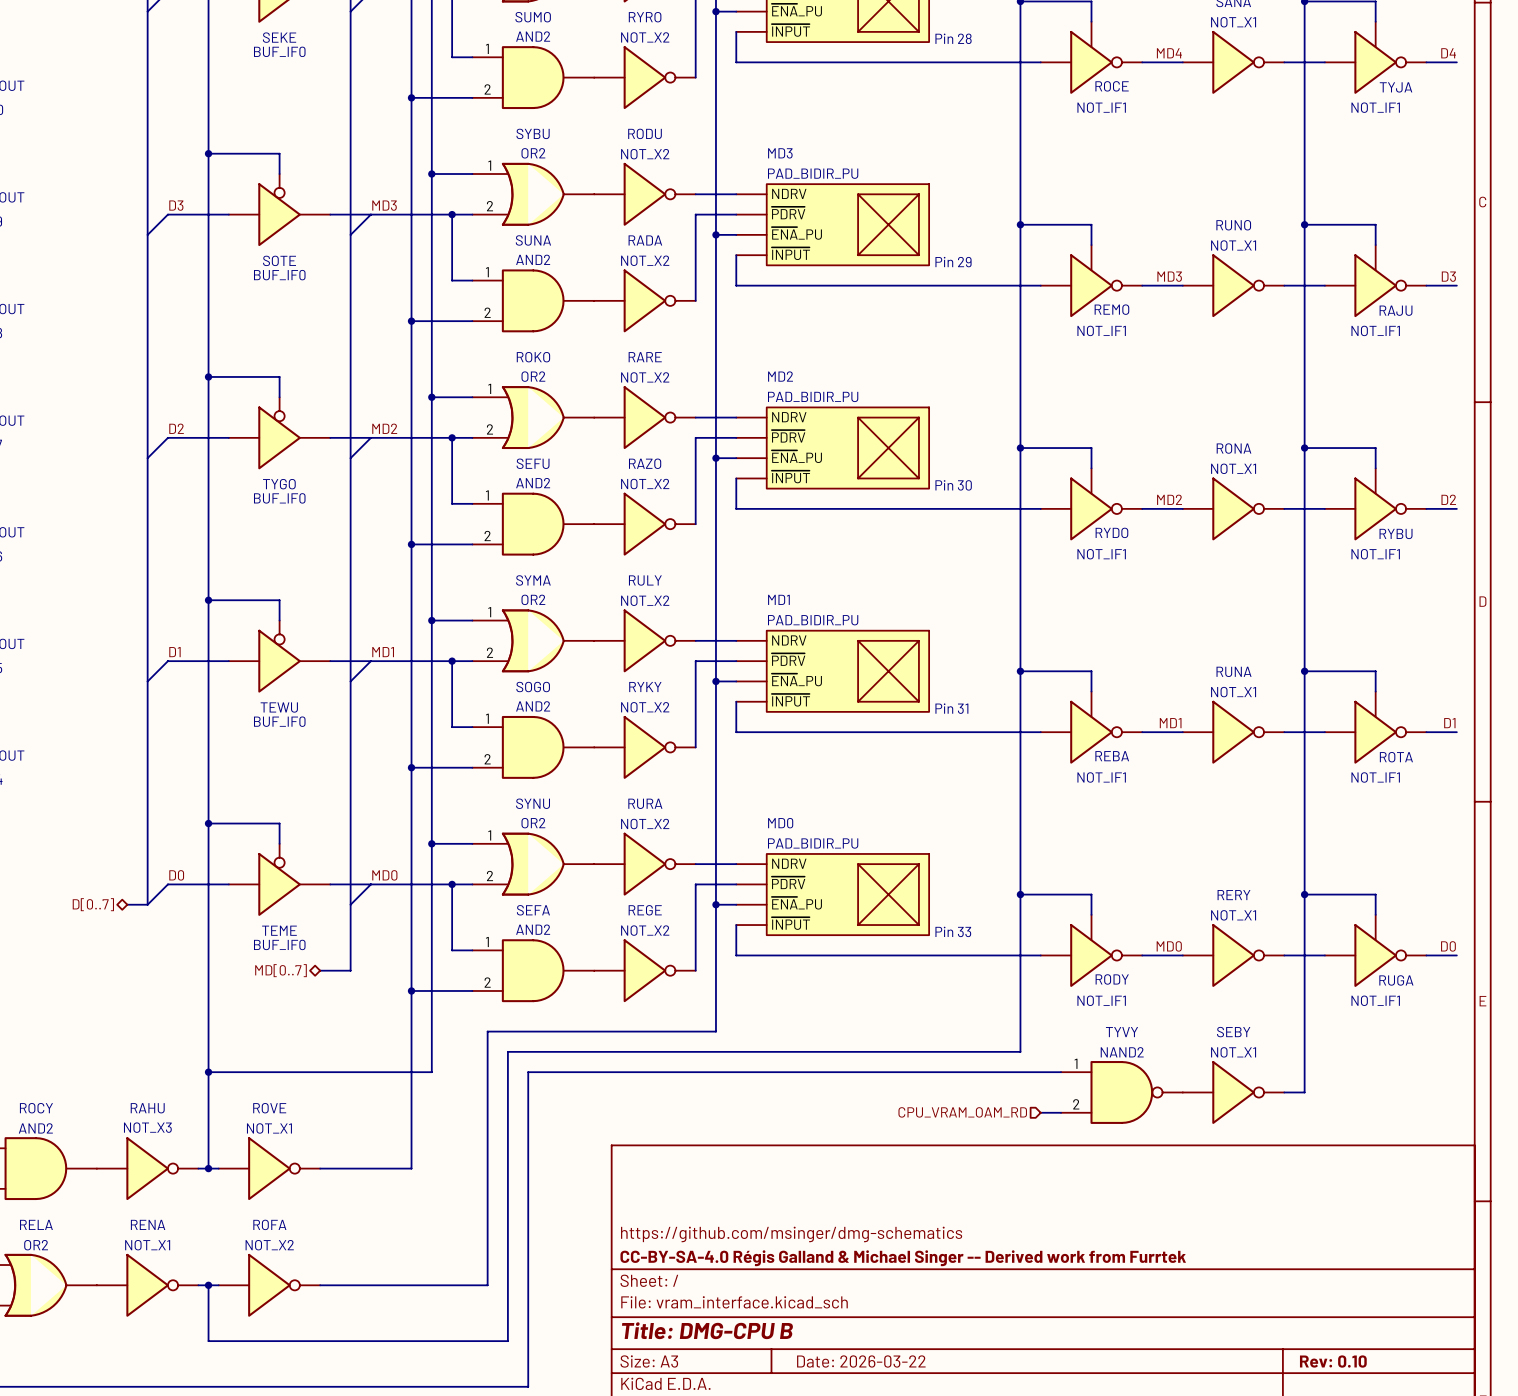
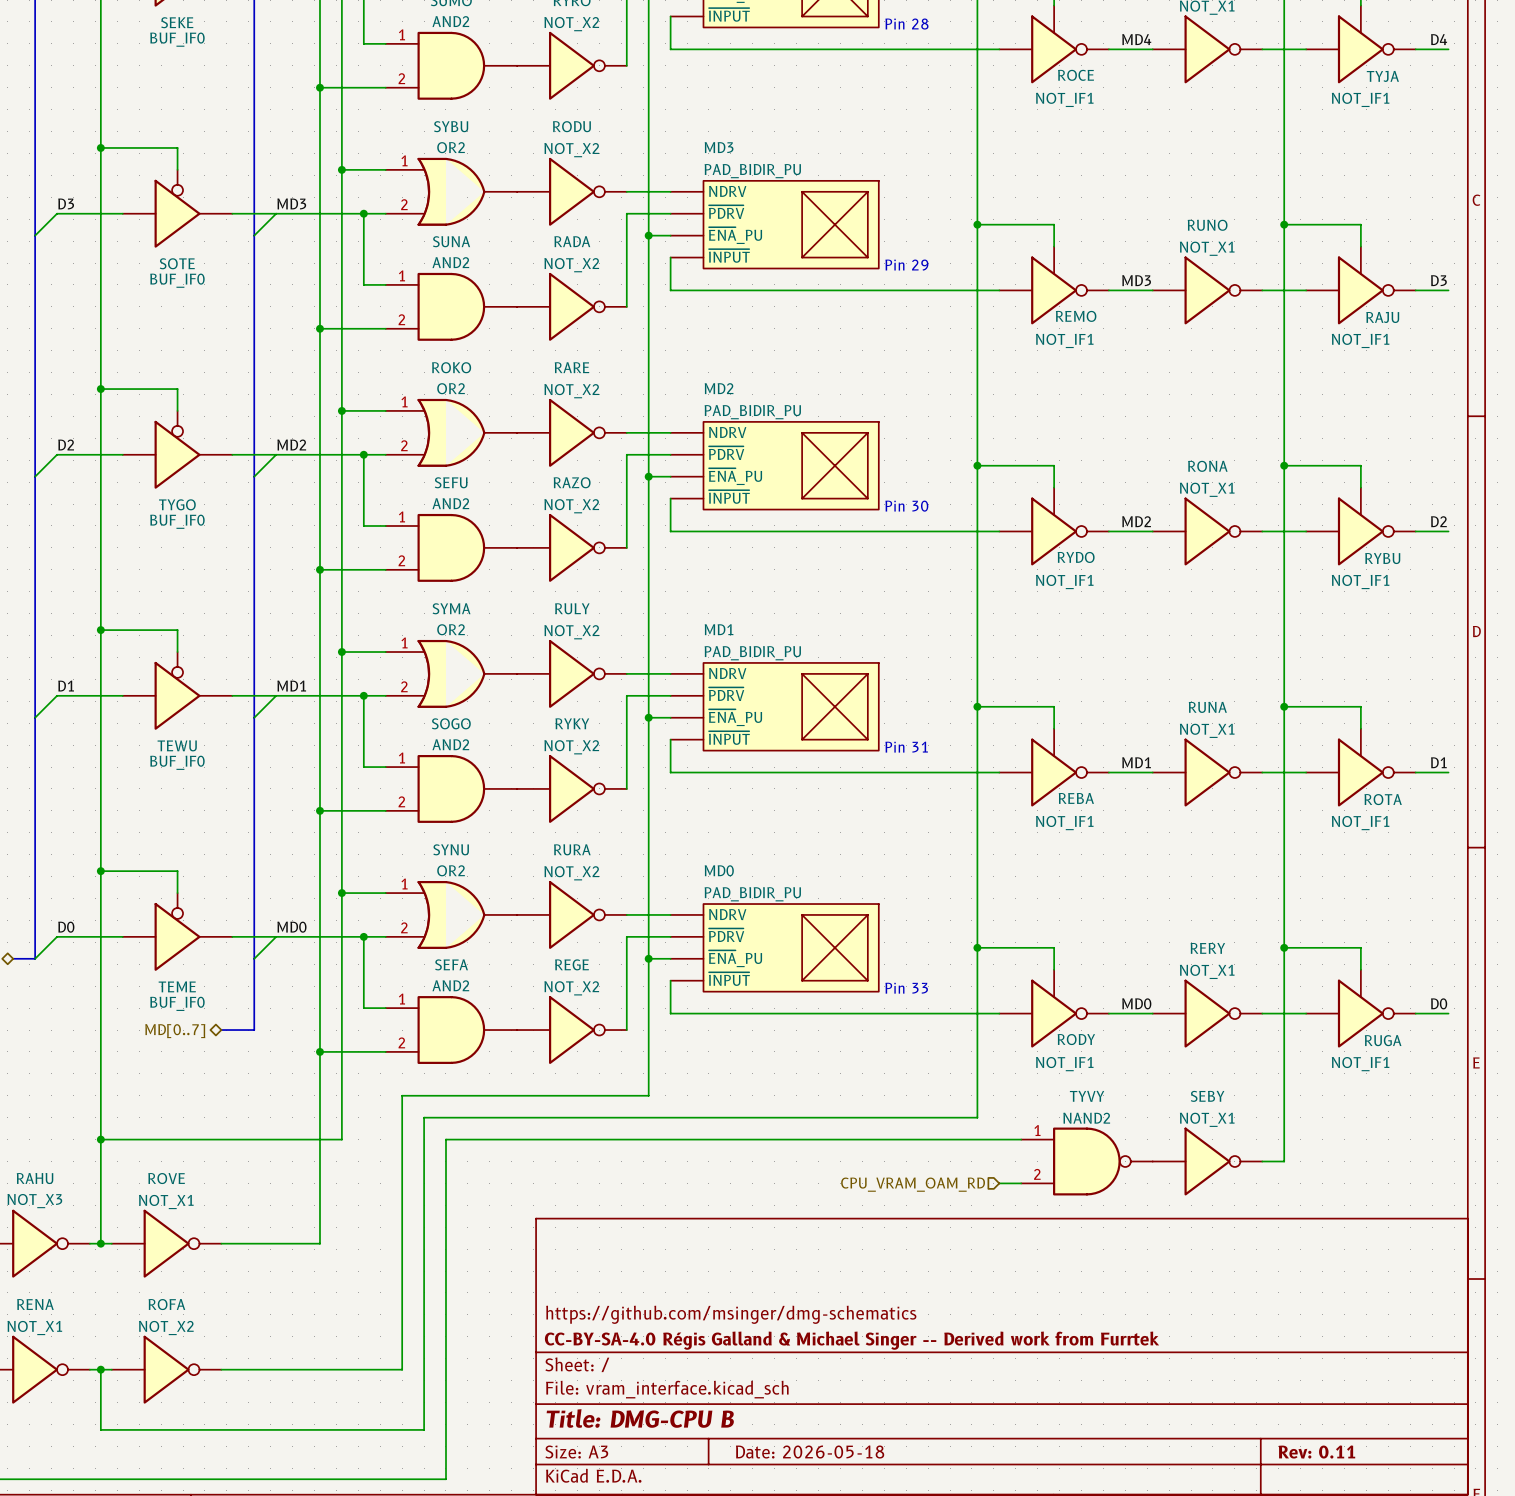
title block: Date: 2026-03-22 (861, 1361) -> Date: 2026-05-18 (810, 1452)
title block: Rev: 0.10 (1333, 1361) -> Rev: 0.11 (1316, 1452)

